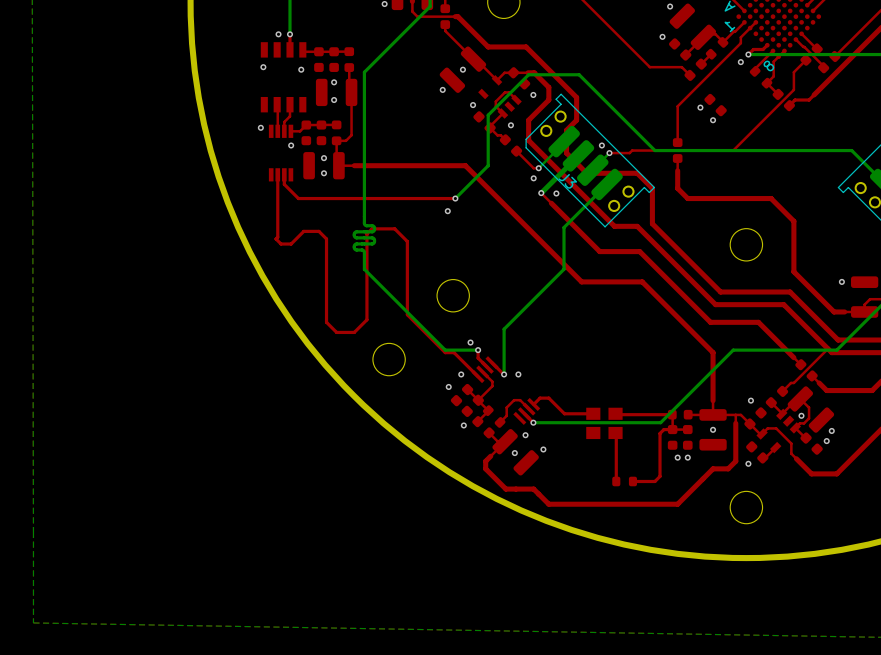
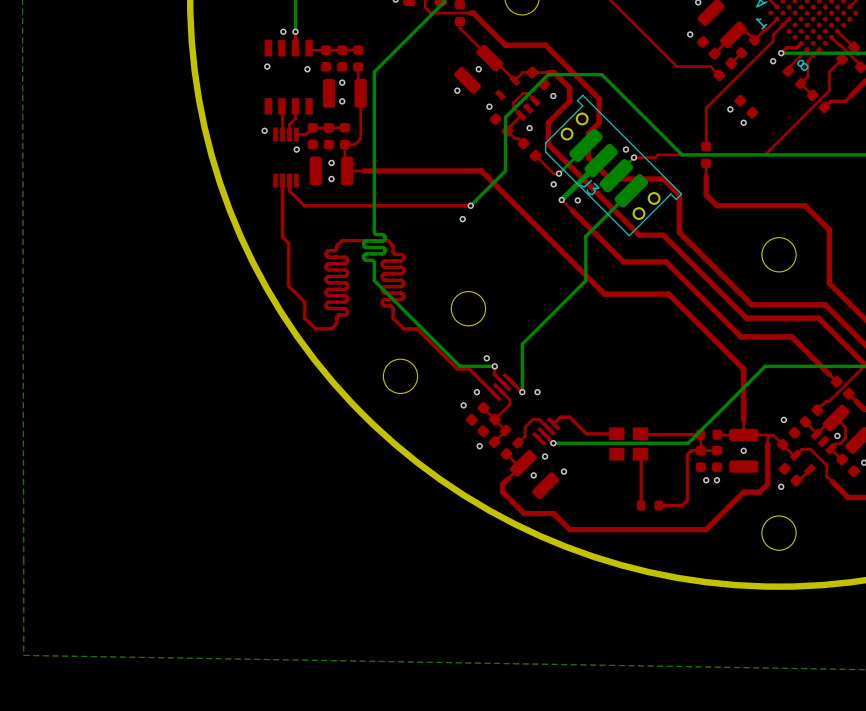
top track: (277, 228) (276, 238) (281, 244) (291, 244) (303, 231) (318, 231) (326, 238) (326, 322) (336, 332) (354, 332) (366, 319) (366, 233) (372, 228) (394, 228) (407, 241) (407, 314) (445, 352) -> (282, 237) (288, 243) (288, 286) (304, 302) (304, 318) (315, 328) (331, 328) (336, 323) (337, 315) (345, 314) (347, 312) (345, 308) (328, 308) (326, 306) (327, 302) (345, 302) (347, 299) (345, 295) (326, 294) (327, 289) (345, 289) (347, 286) (345, 282) (326, 281) (327, 276) (345, 276) (347, 273) (345, 270) (326, 269) (327, 263) (345, 263) (347, 259) (345, 257) (327, 257) (326, 251) (335, 250) (336, 245) (342, 240) (387, 240) (393, 245) (393, 253) (402, 254) (403, 258) (401, 260) (384, 261) (382, 265) (401, 267) (403, 271) (401, 273) (384, 273) (382, 278) (384, 280) (401, 280) (403, 284) (401, 286) (384, 286) (382, 291) (384, 293) (401, 293) (403, 297) (401, 299) (384, 299) (382, 304) (392, 306) (393, 318) (403, 328) (417, 328) (457, 369) (460, 369)

